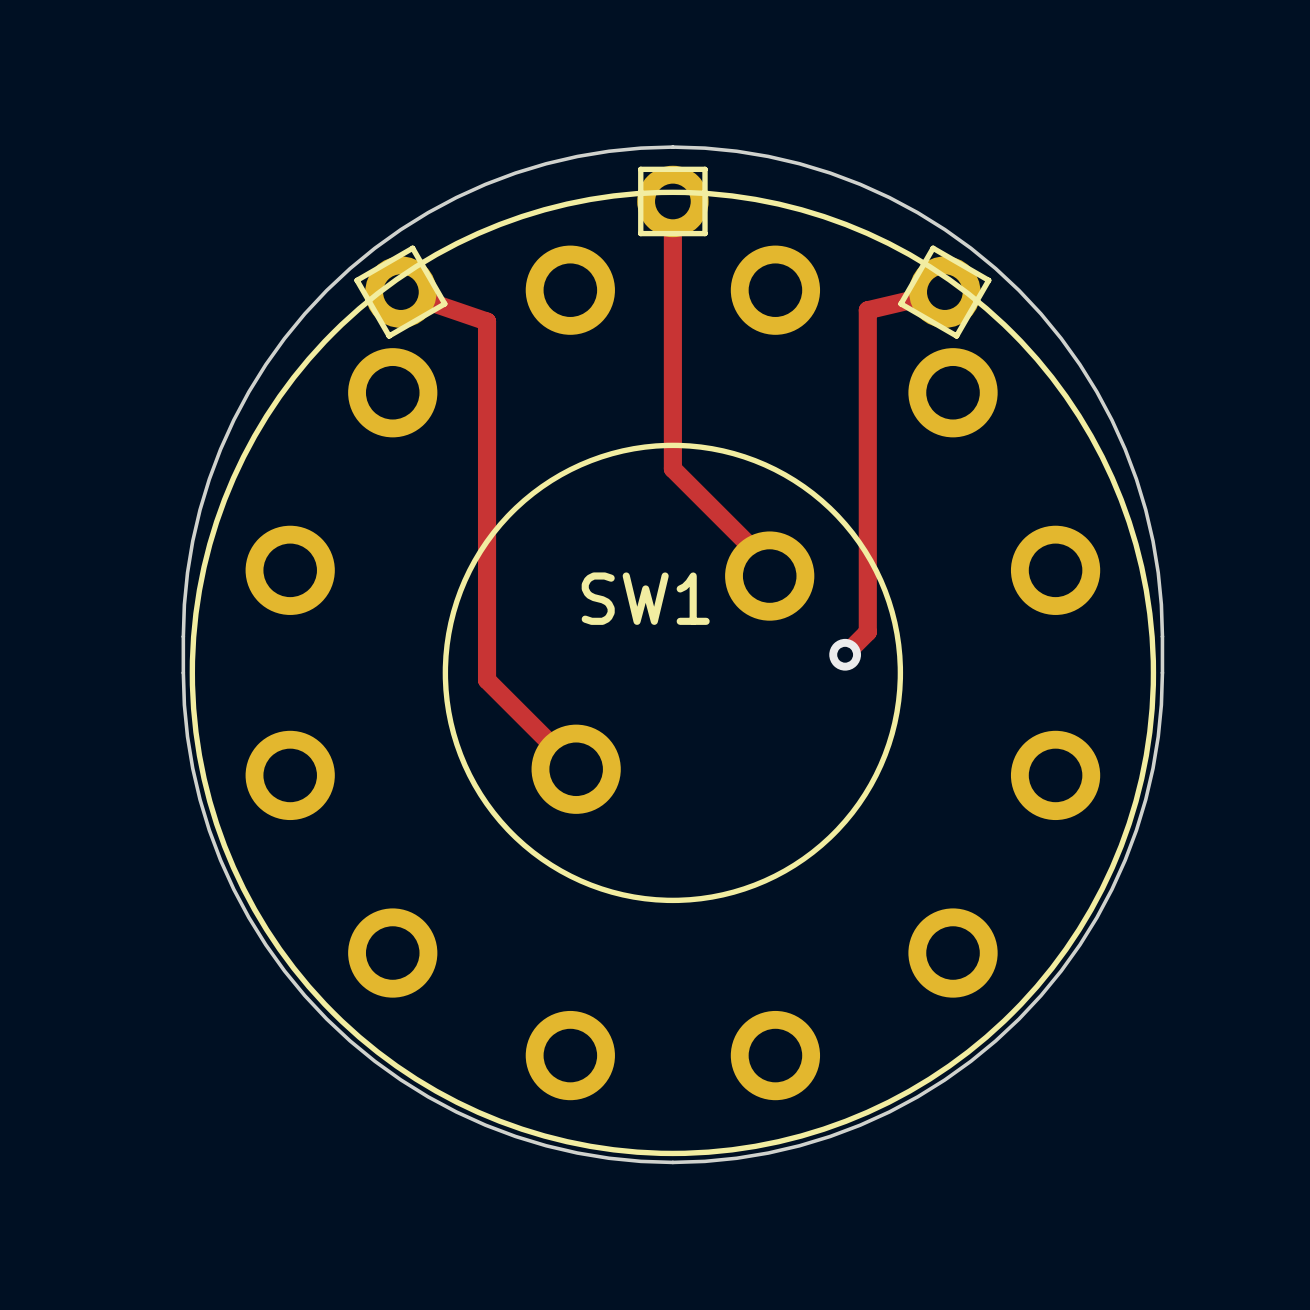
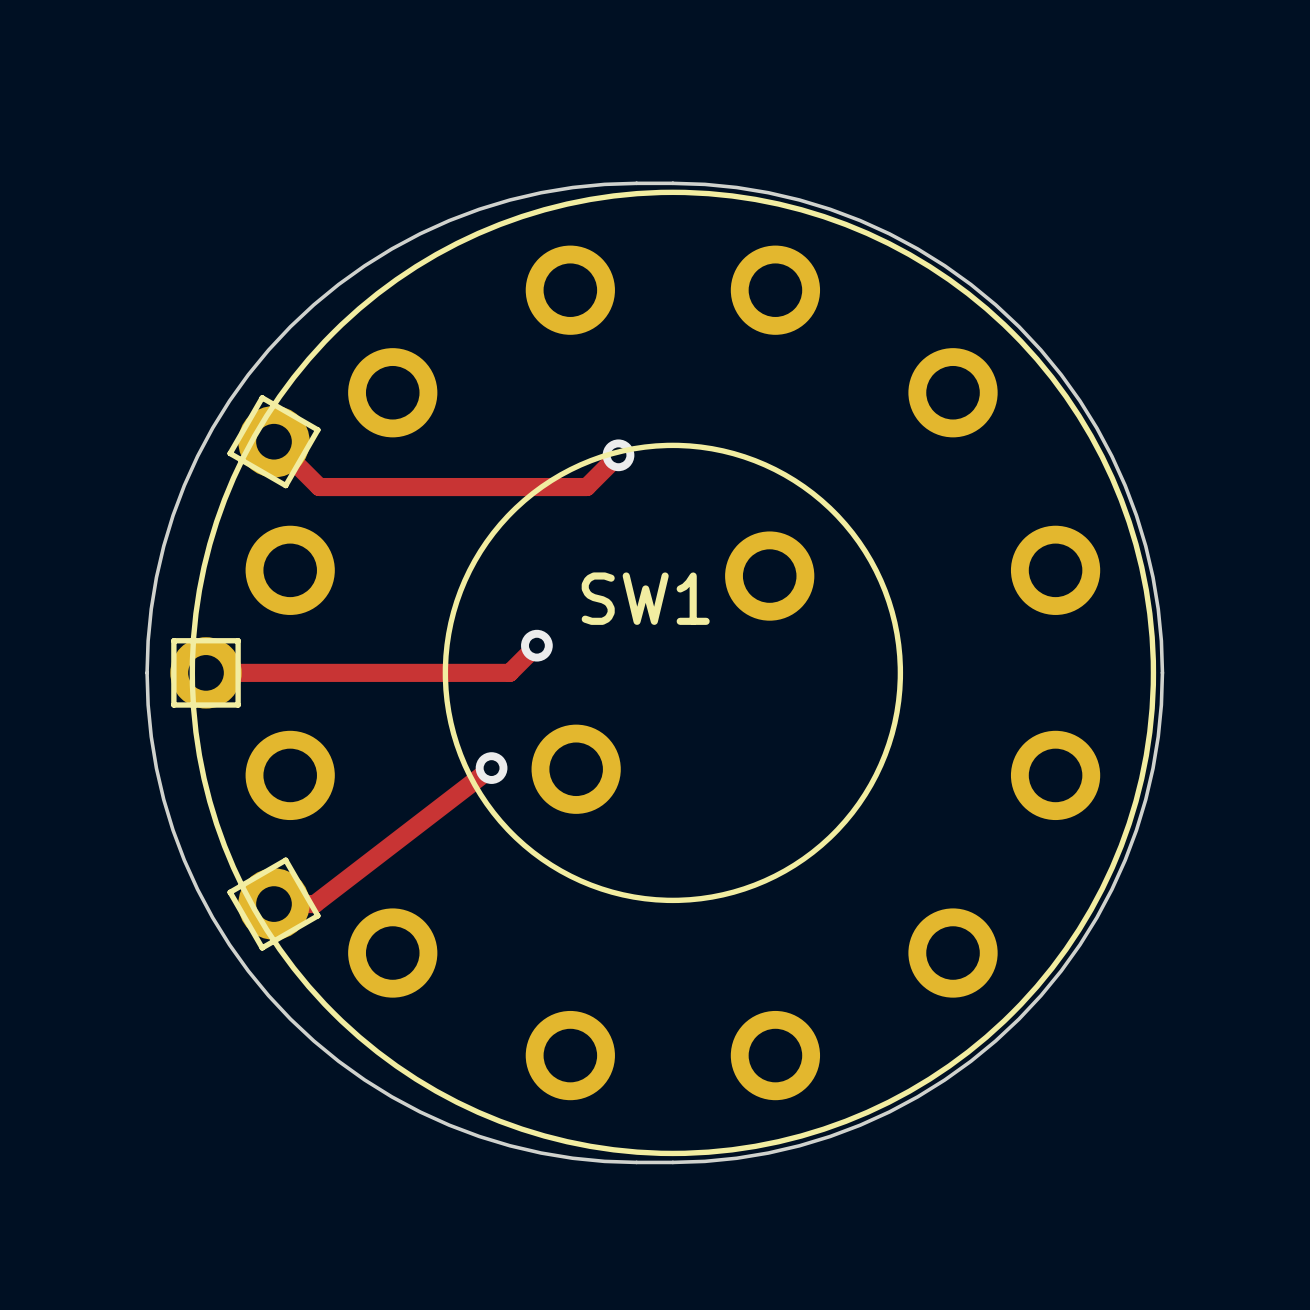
track: (672, 201) (672, 468) (769, 565) -> none
part position: (672, 201) -> (206, 672)
track: (400, 292) (487, 321) (487, 680) (576, 769) -> none
part position: (400, 292) -> (273, 904)
track: (944, 292) (867, 310) (867, 632) (845, 654) -> none
part position: (944, 292) -> (273, 441)
track: none -> (273, 441) (319, 487) (586, 487) (618, 455)
via: none -> (618, 455)
track: none -> (536, 645) (509, 672) (206, 672)
via: none -> (536, 645)
via: (845, 654) -> none
board edge: (1162, 672) (1161, 604) (1158, 572) (1145, 509) (1125, 449) (1096, 391) (1061, 338) (1019, 290) (970, 248) (944, 229) (889, 197) (830, 173) (799, 163) (736, 151) (672, 147) (640, 148) (577, 156) (546, 163) (485, 184) (428, 212) (374, 248) (326, 290) (284, 338) (248, 391) (233, 420) (209, 479) (192, 541) (184, 604) (184, 704) (192, 768) (200, 799) (220, 860) (233, 889) (265, 944) (304, 995) (350, 1040) (400, 1079) (456, 1111) (515, 1136) (546, 1145) (608, 1158) (672, 1162) -> (1162, 672) (1158, 608) (1153, 577) (1136, 515) (1111, 456) (1079, 400) (1040, 350) (1019, 326) (970, 284) (917, 248) (860, 220) (799, 200) (736, 187) (704, 184) (604, 184) (541, 192) (479, 209) (420, 233) (391, 248) (338, 284) (290, 326) (268, 350) (229, 400) (197, 456) (173, 515) (156, 577) (151, 608) (147, 672) (148, 704) (156, 768) (173, 830) (197, 889) (229, 944) (268, 995) (290, 1019) (338, 1061) (391, 1096) (449, 1125) (509, 1145) (572, 1158) (604, 1161) (672, 1162)
track: none -> (491, 768) (314, 904) (273, 904)
via: none -> (491, 768)

